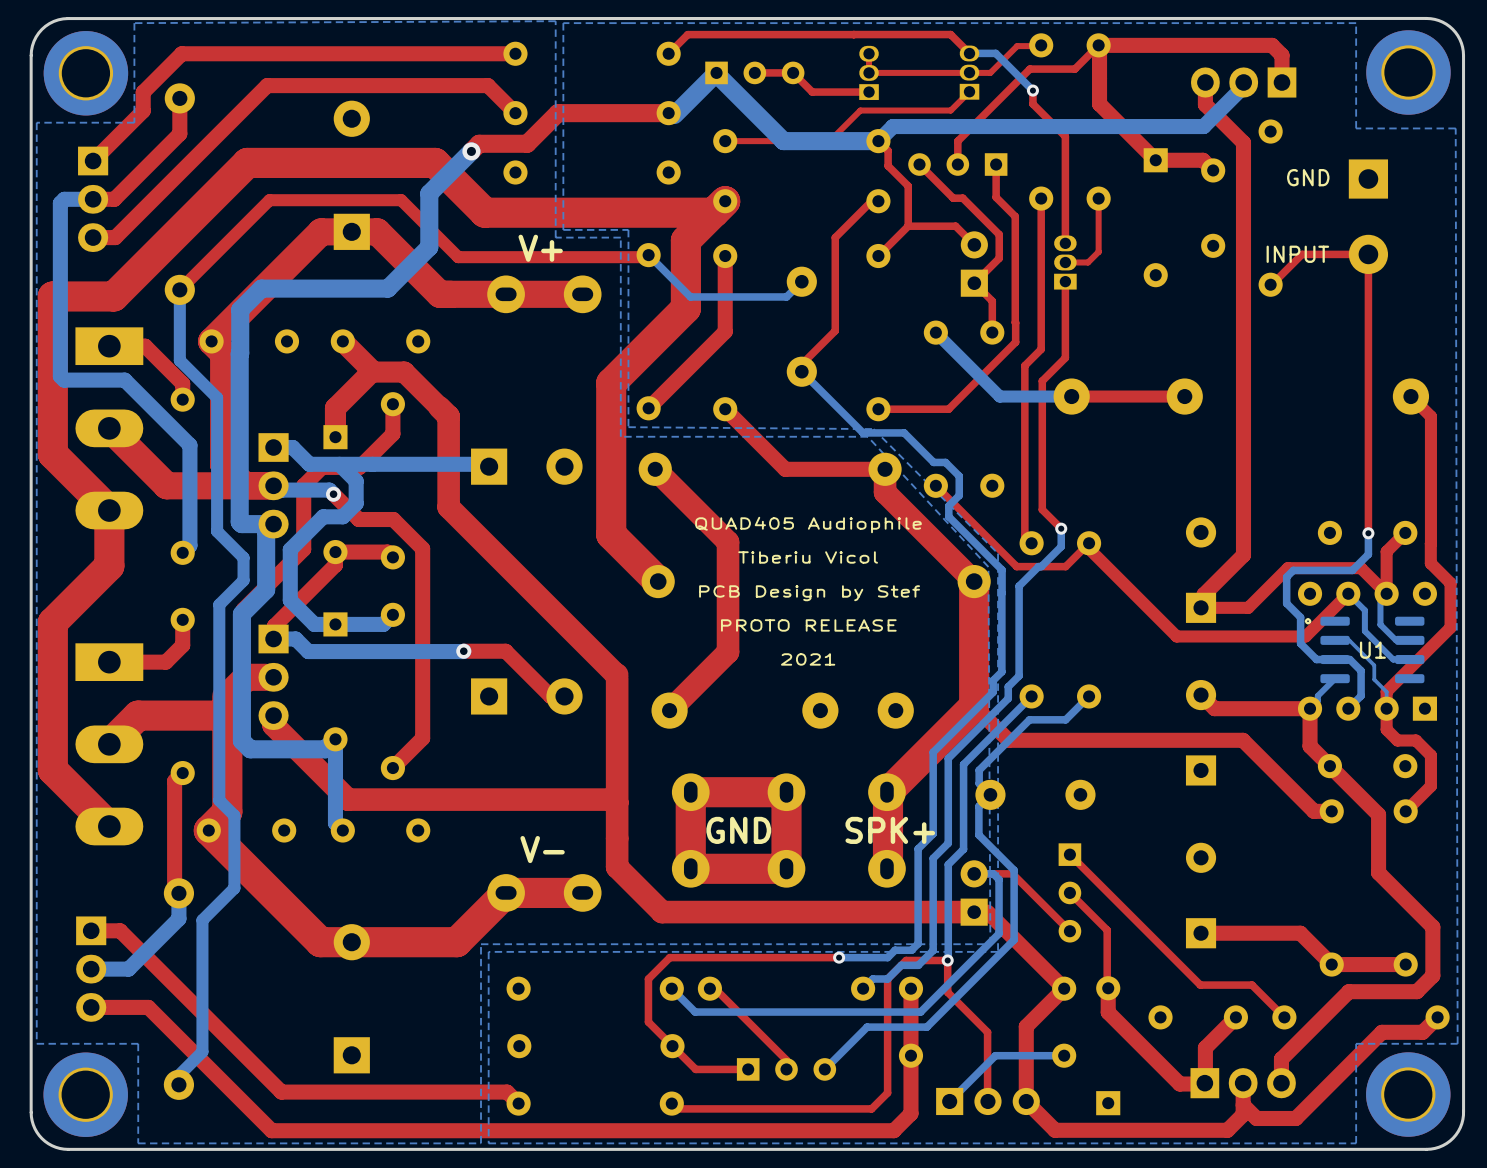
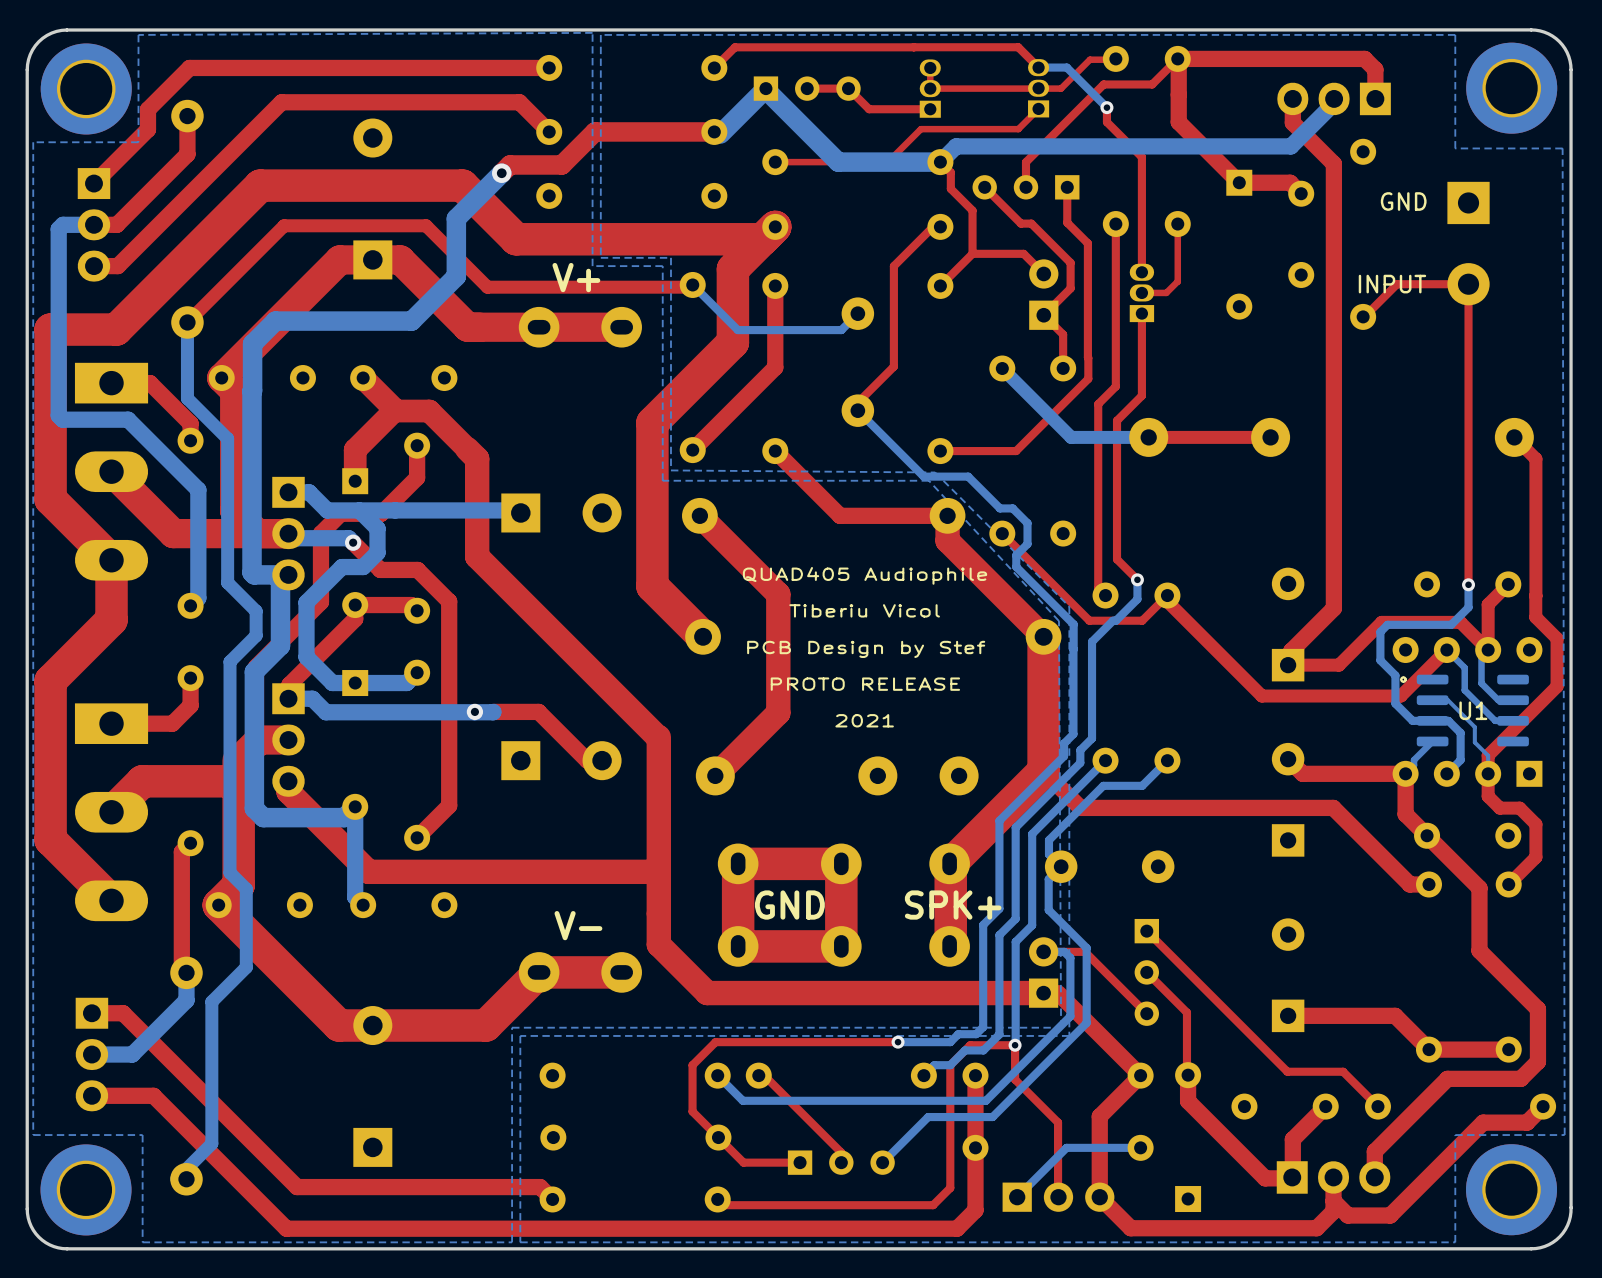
via position: (463, 651) -> (474, 711)

